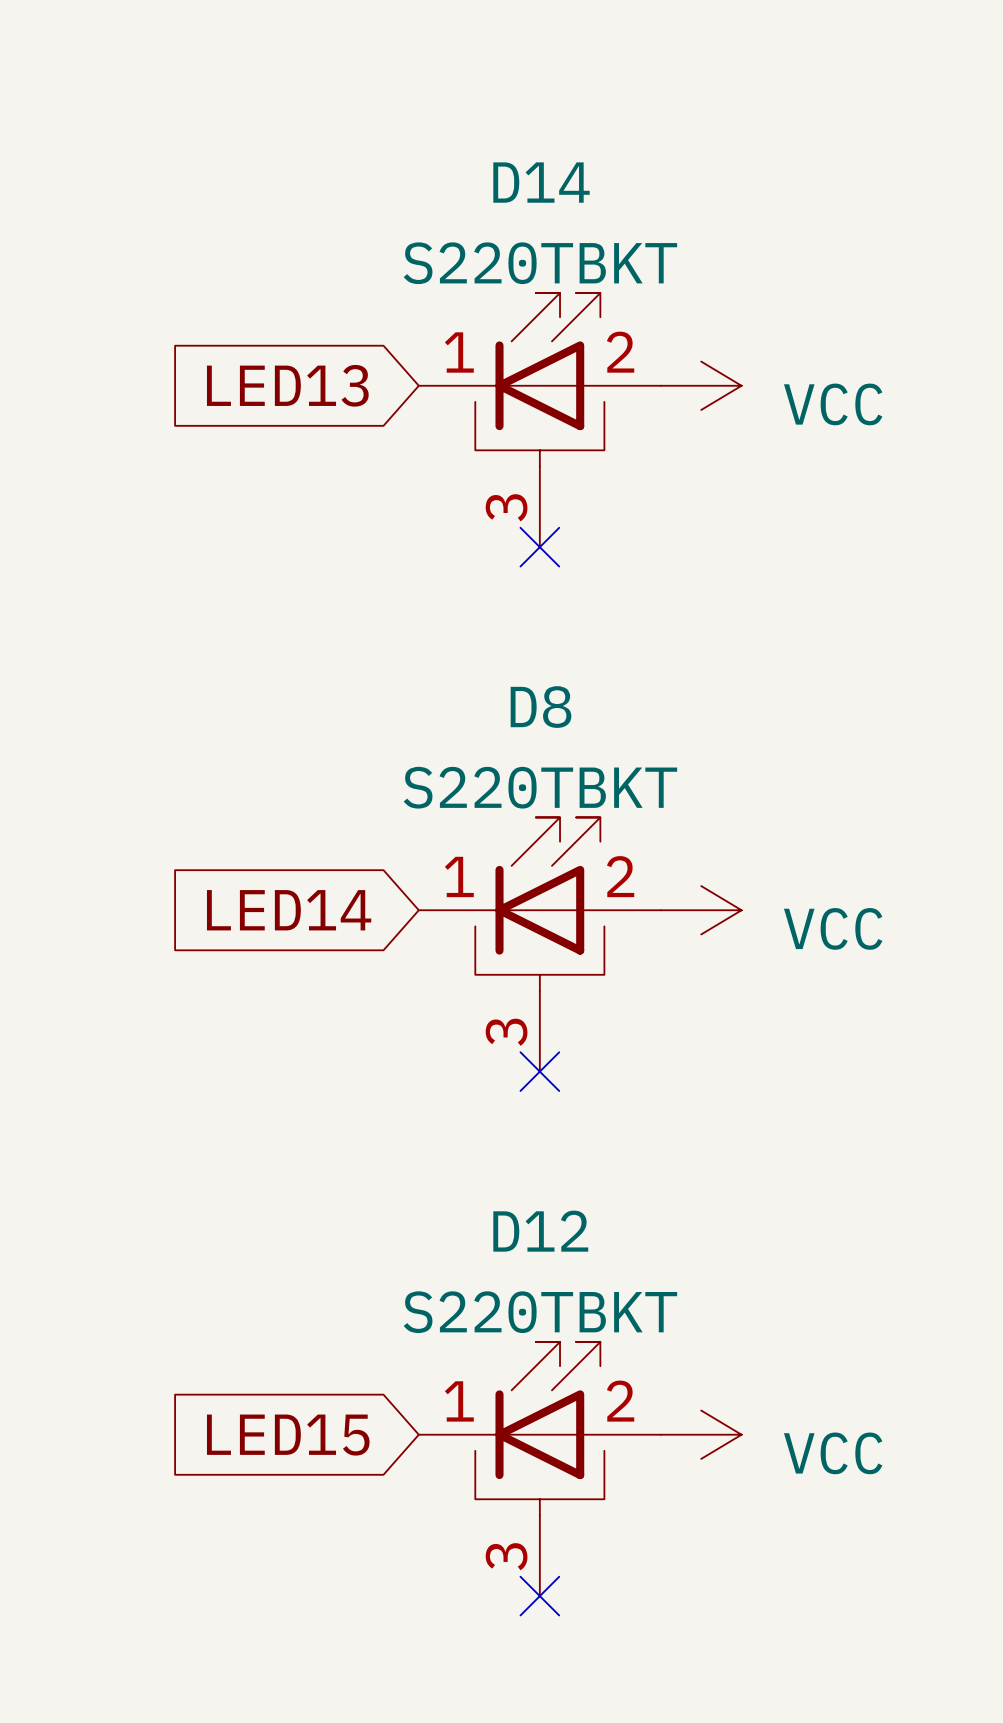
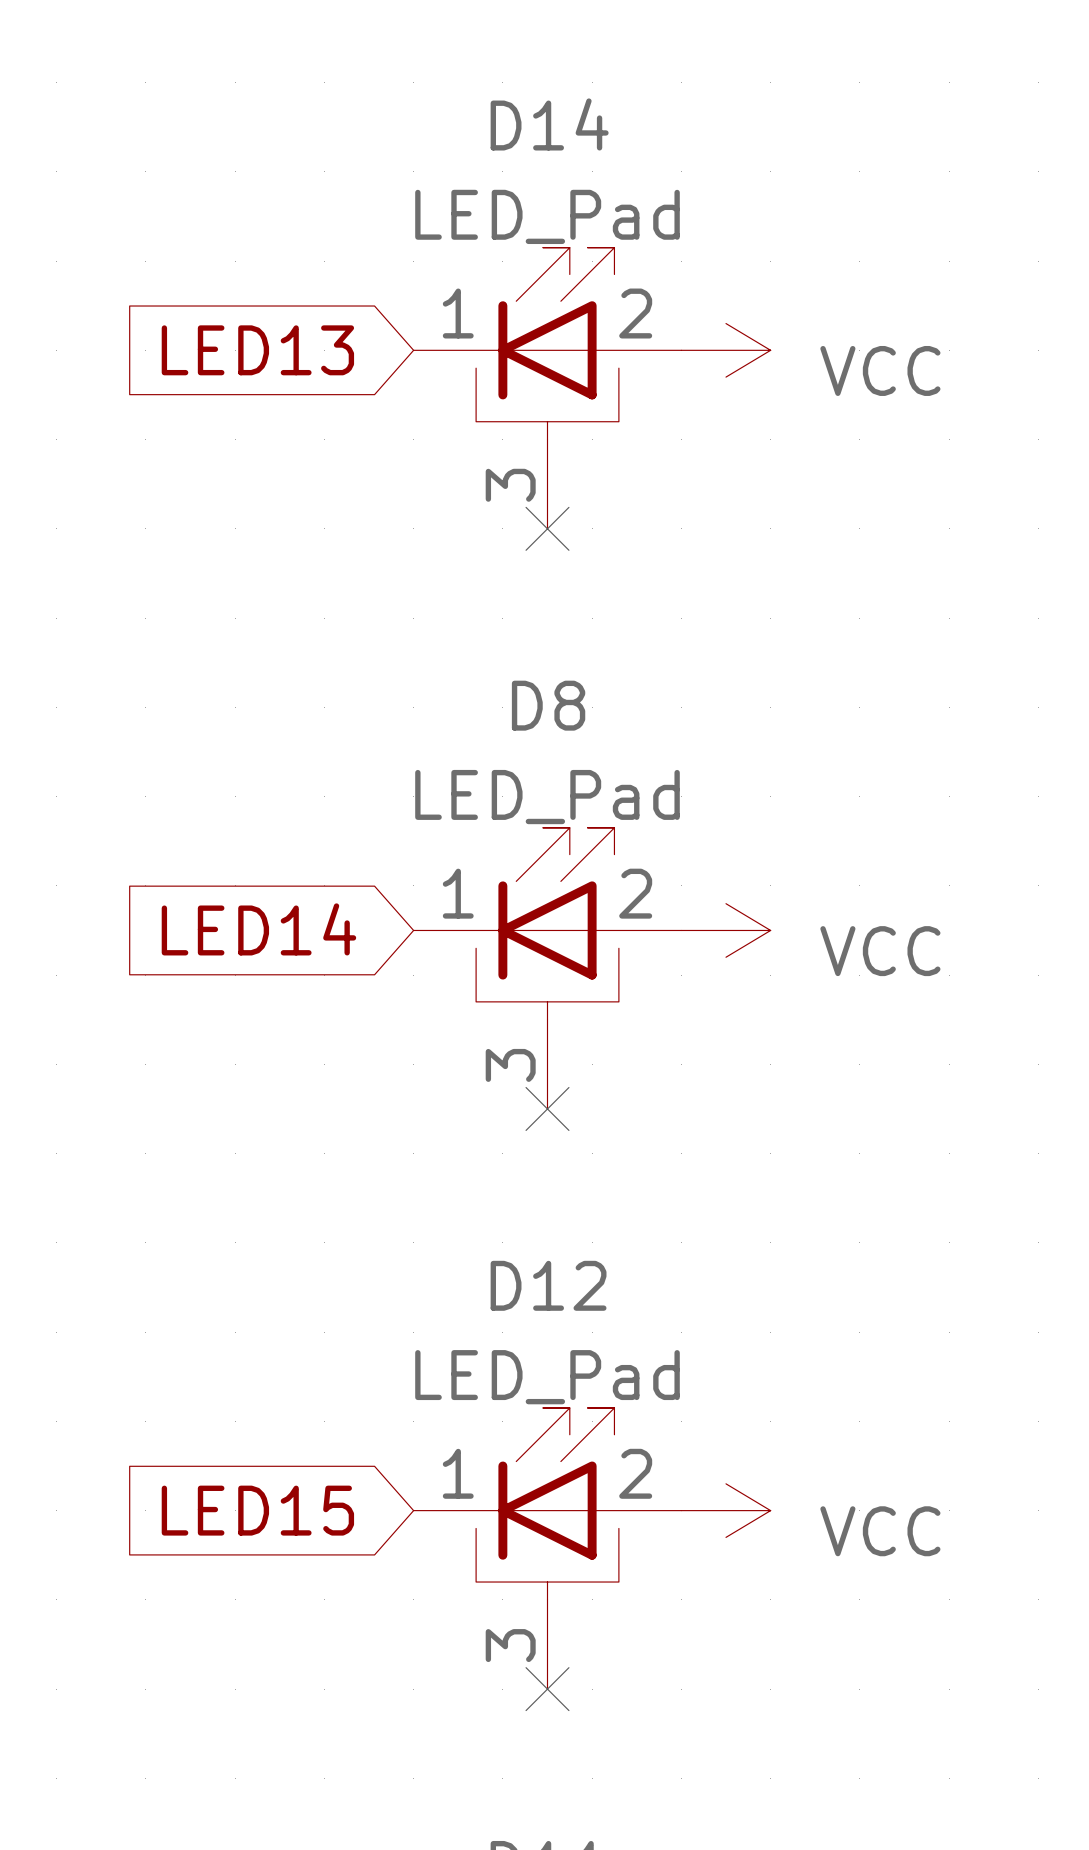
D14 value: S220TBKT (540, 263) -> LED_Pad (547, 216)
D8 value: S220TBKT (540, 787) -> LED_Pad (547, 797)
D12 value: S220TBKT (540, 1312) -> LED_Pad (547, 1377)

